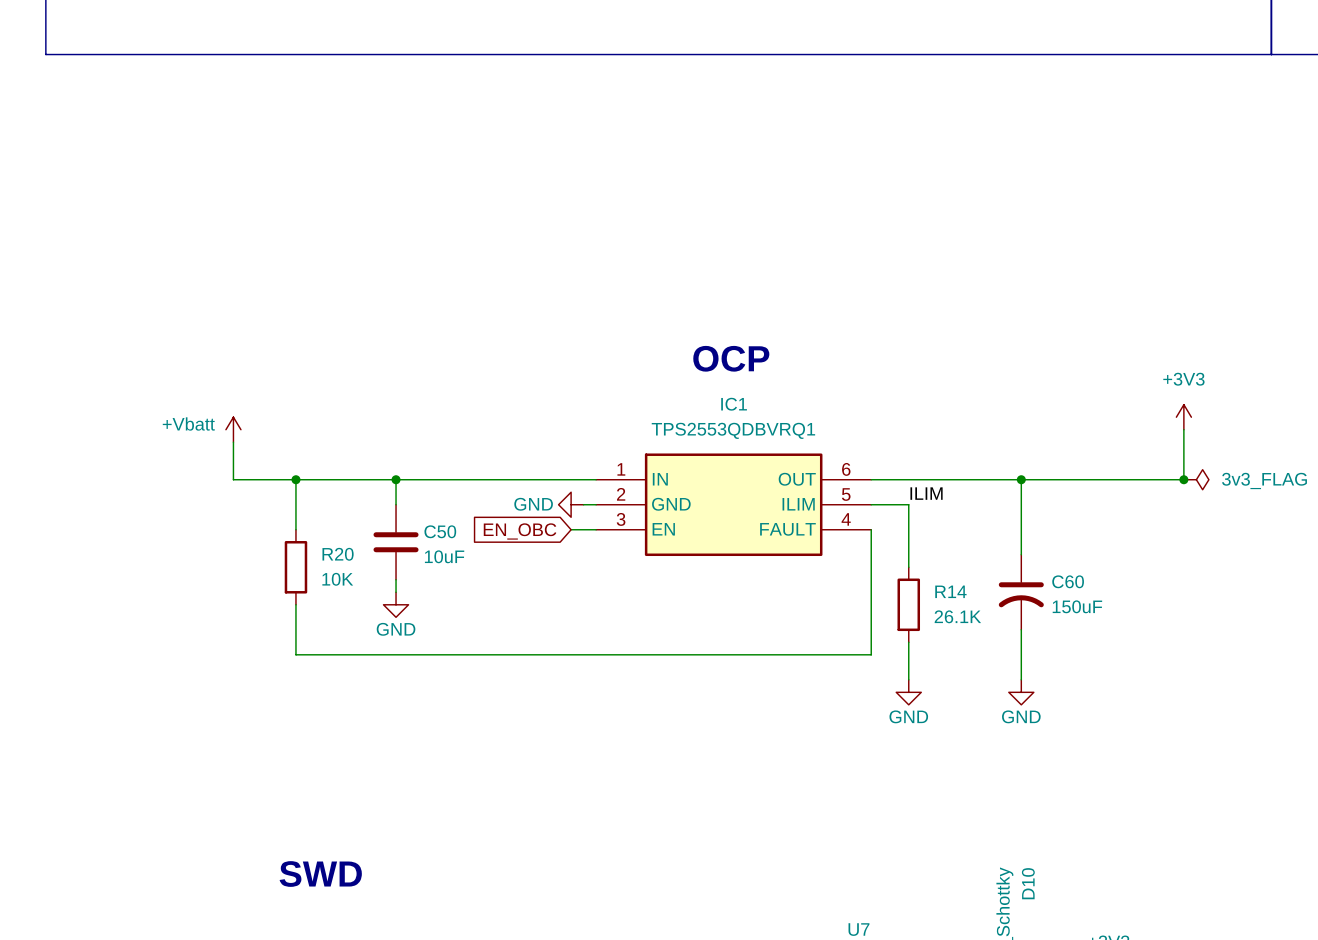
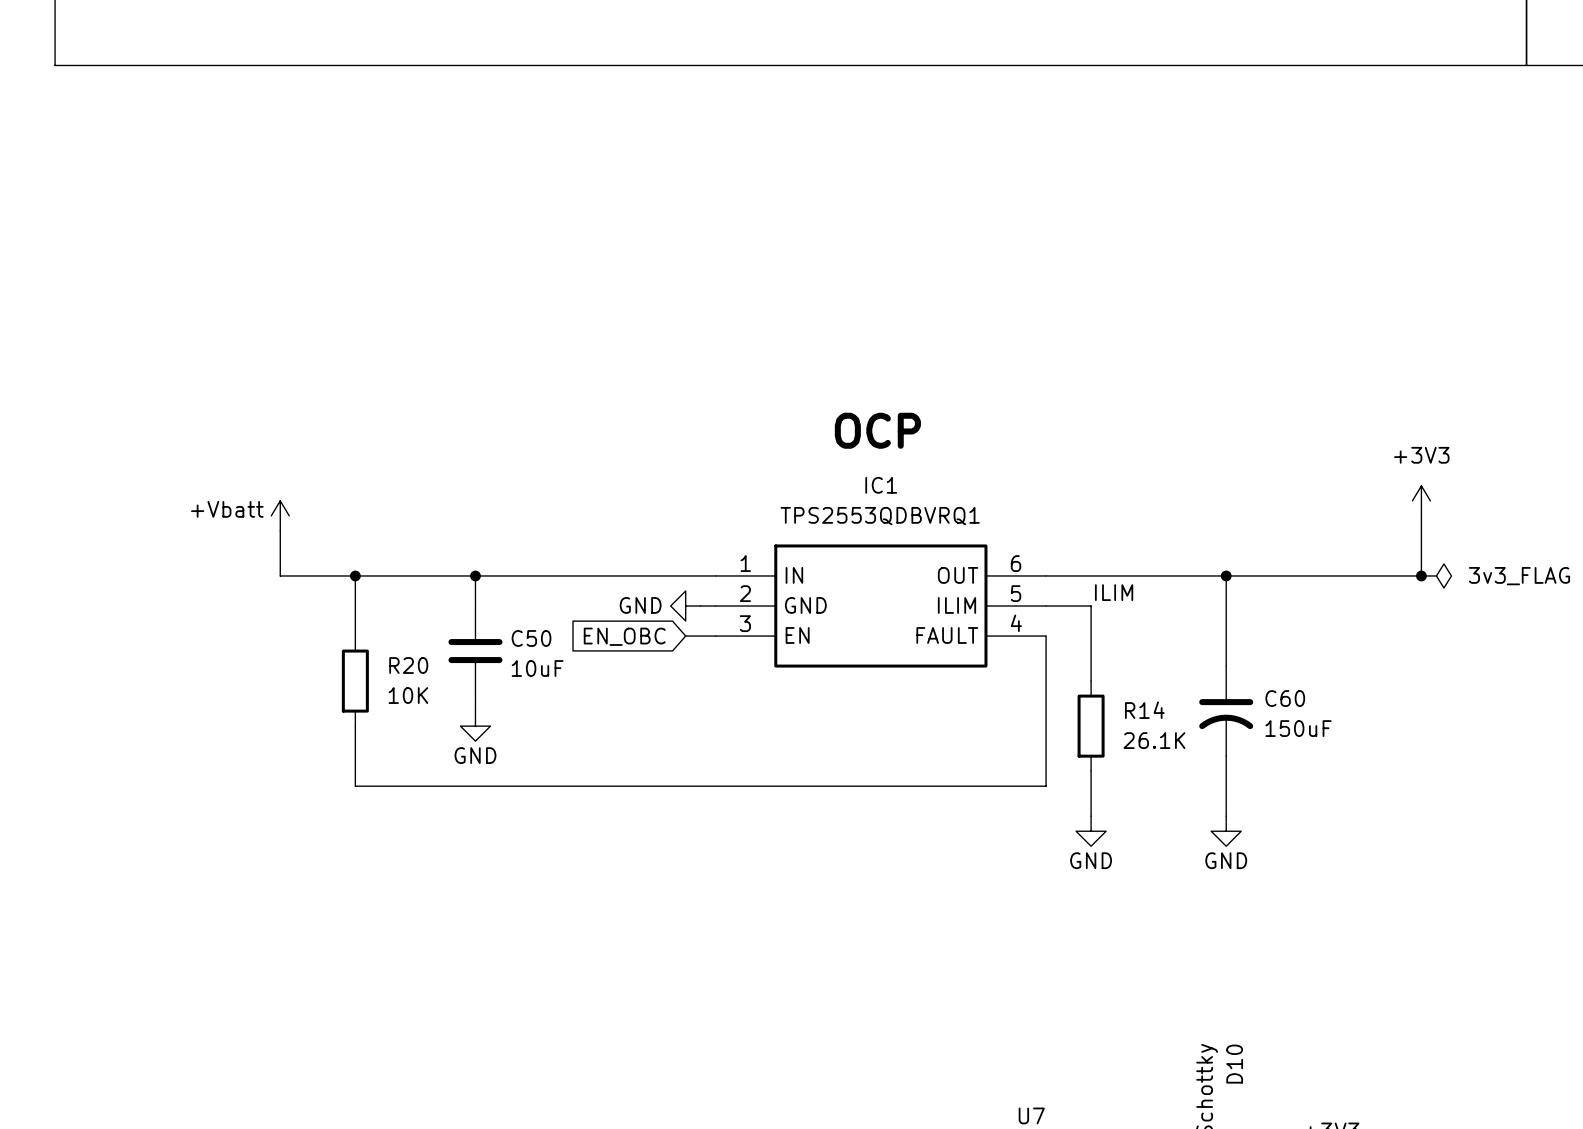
text: SWD (320, 874) -> none

